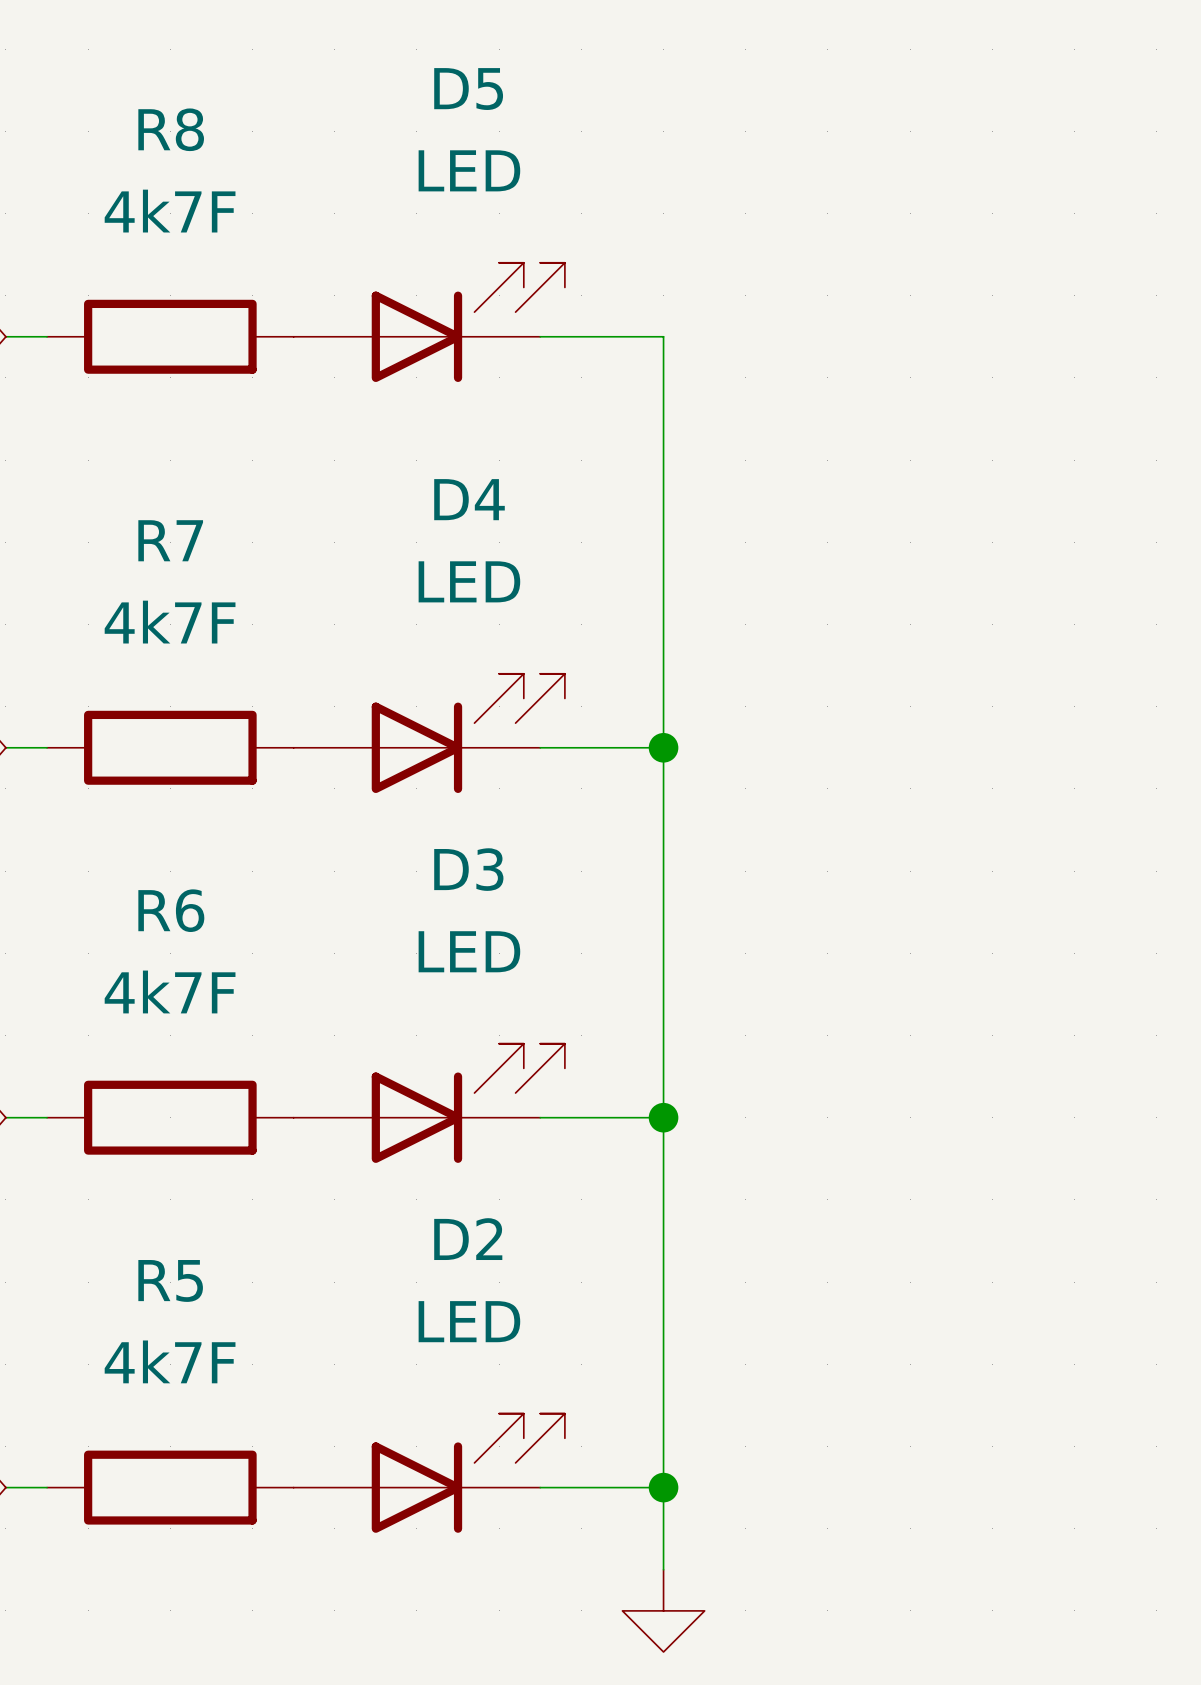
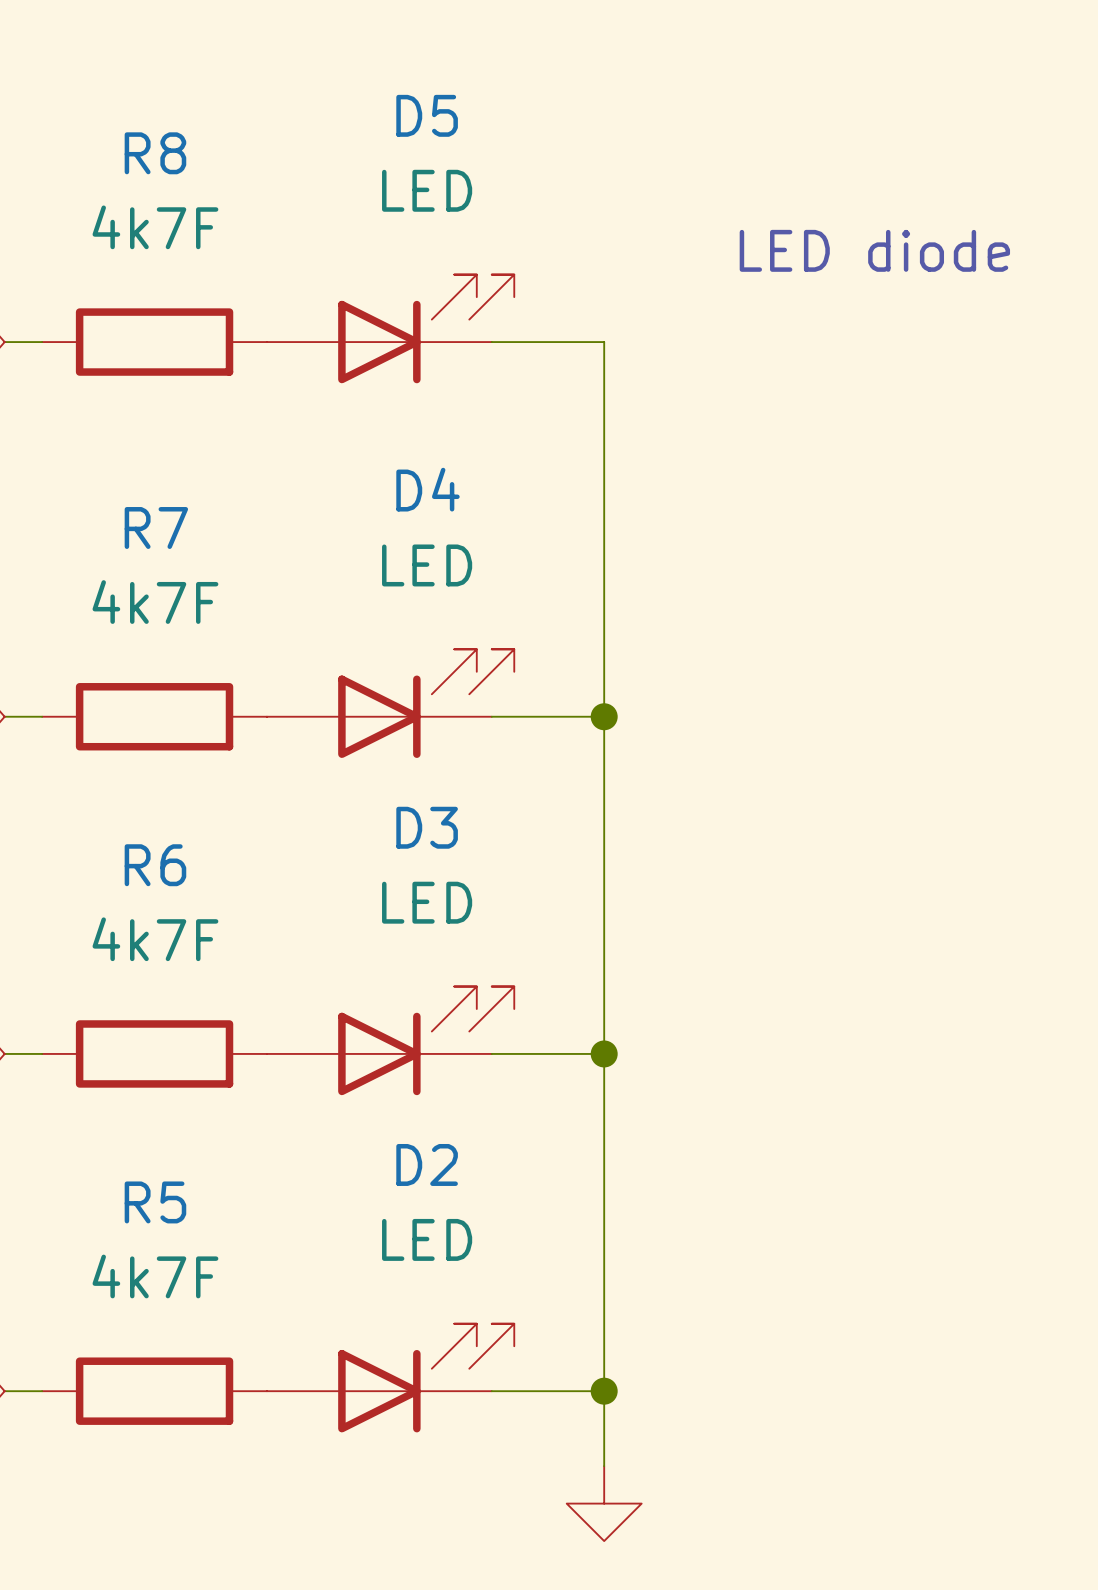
text: none -> LED diode (874, 250)

